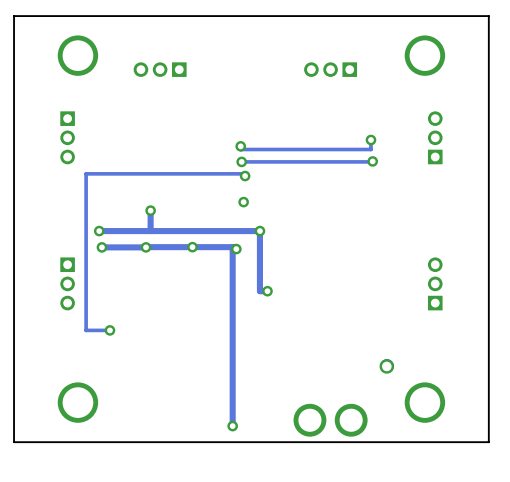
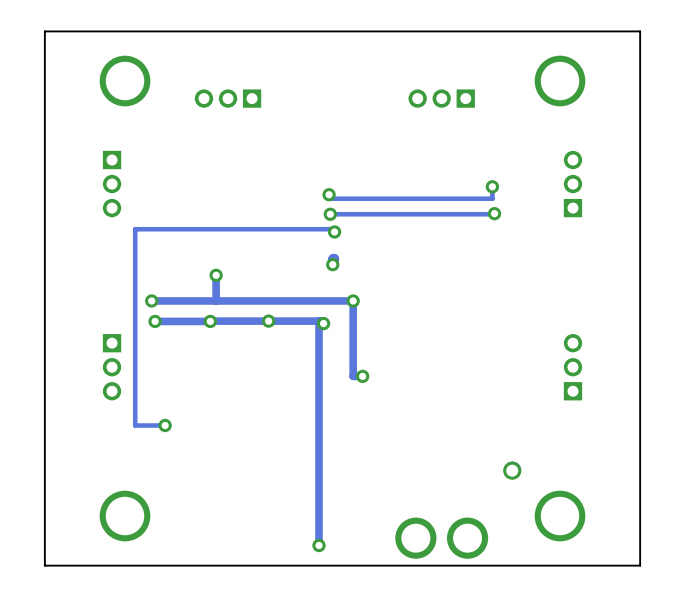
track: none -> (333, 259) (333, 259)

